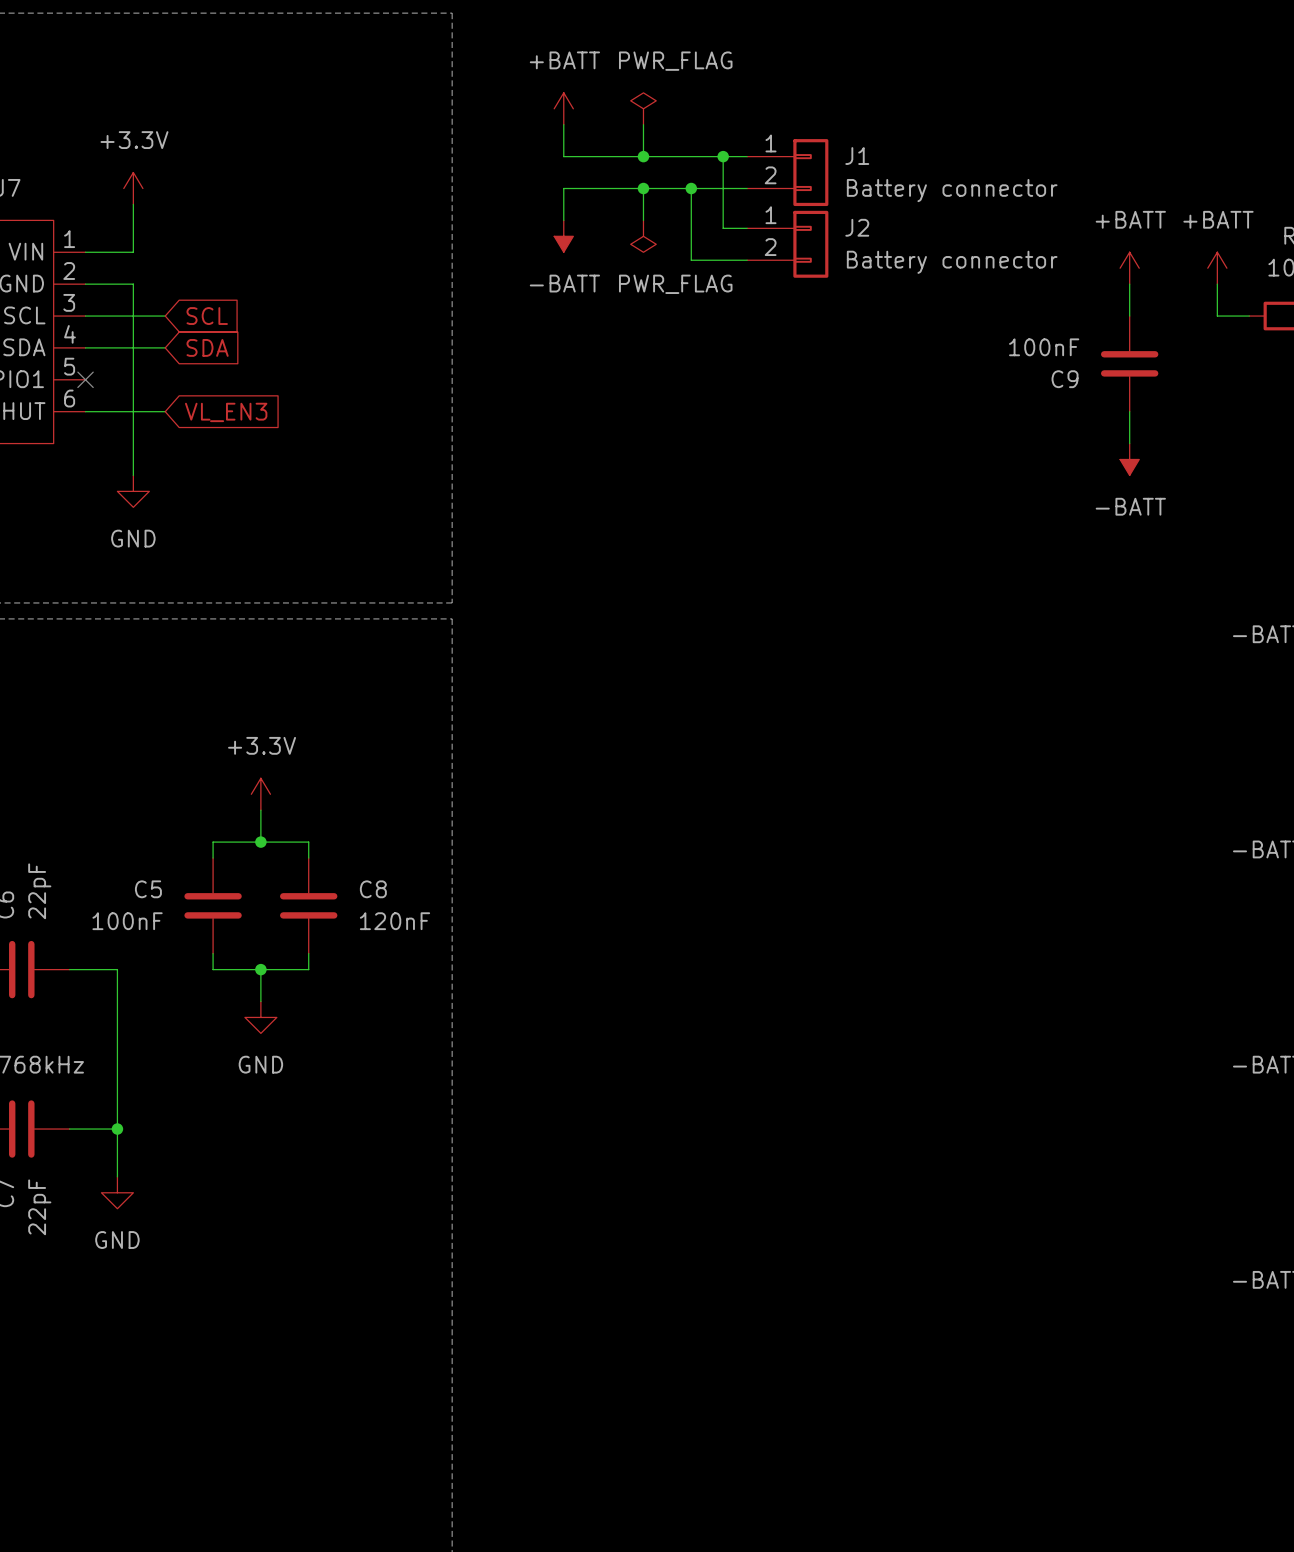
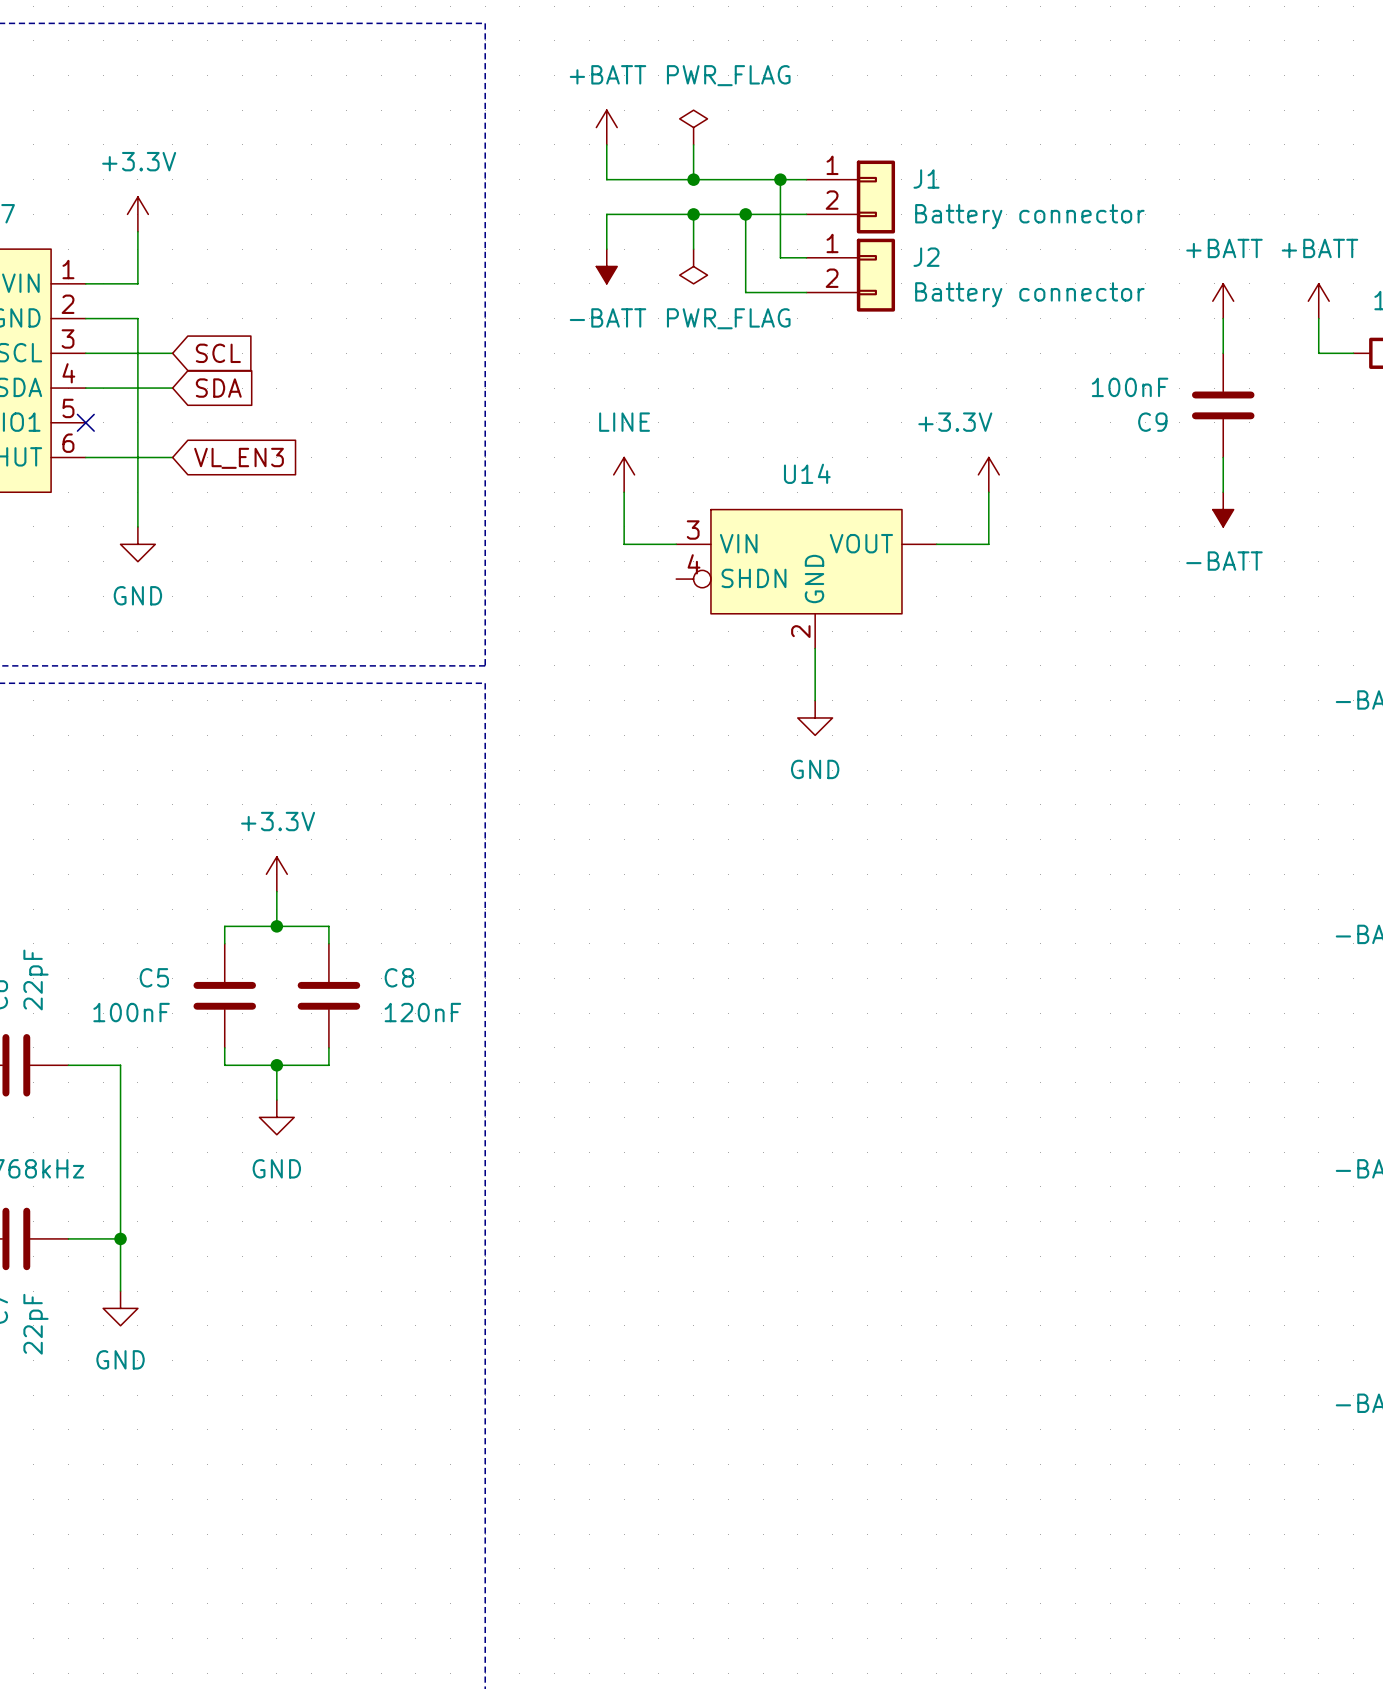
power symbol: none -> LINE (624, 474)
power symbol: none -> +3.3V (988, 474)
wire: none -> (624, 492) (624, 544) (676, 544)
wire: none -> (988, 492) (988, 544) (936, 544)
U14: none -> (806, 579)
wire: none -> (815, 648) (815, 700)
power symbol: none -> GND (815, 717)

